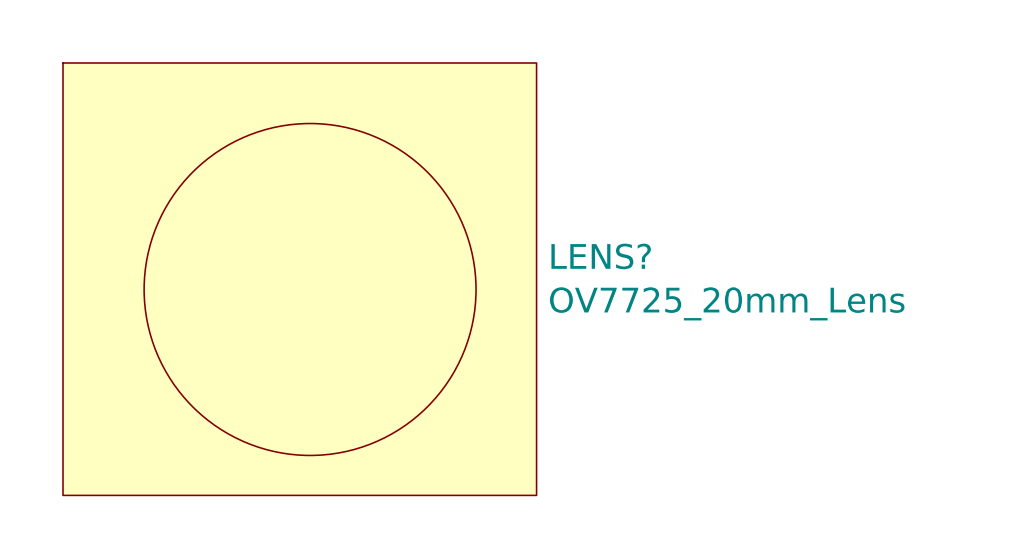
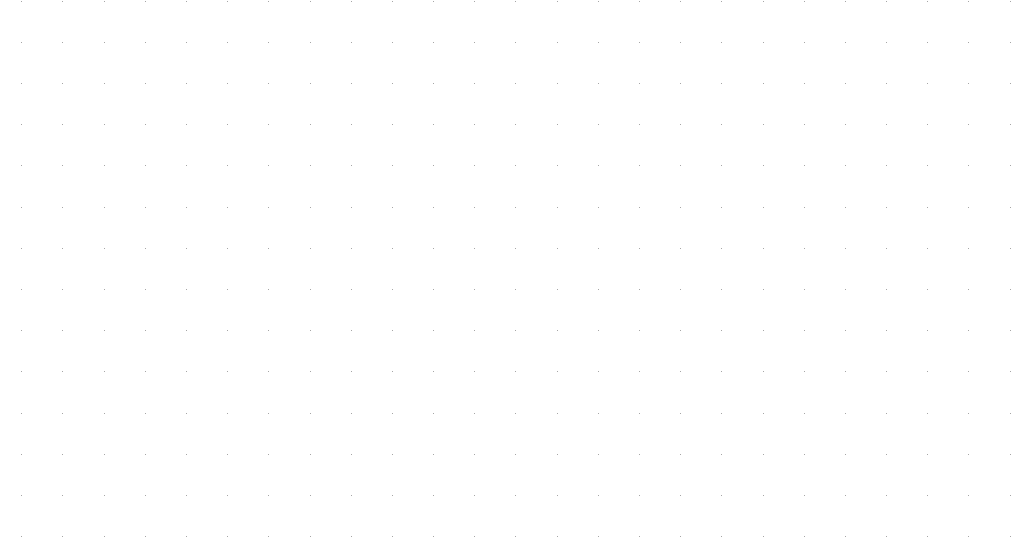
LENS?: OV7725_20mm_Lens (299, 279) -> none

